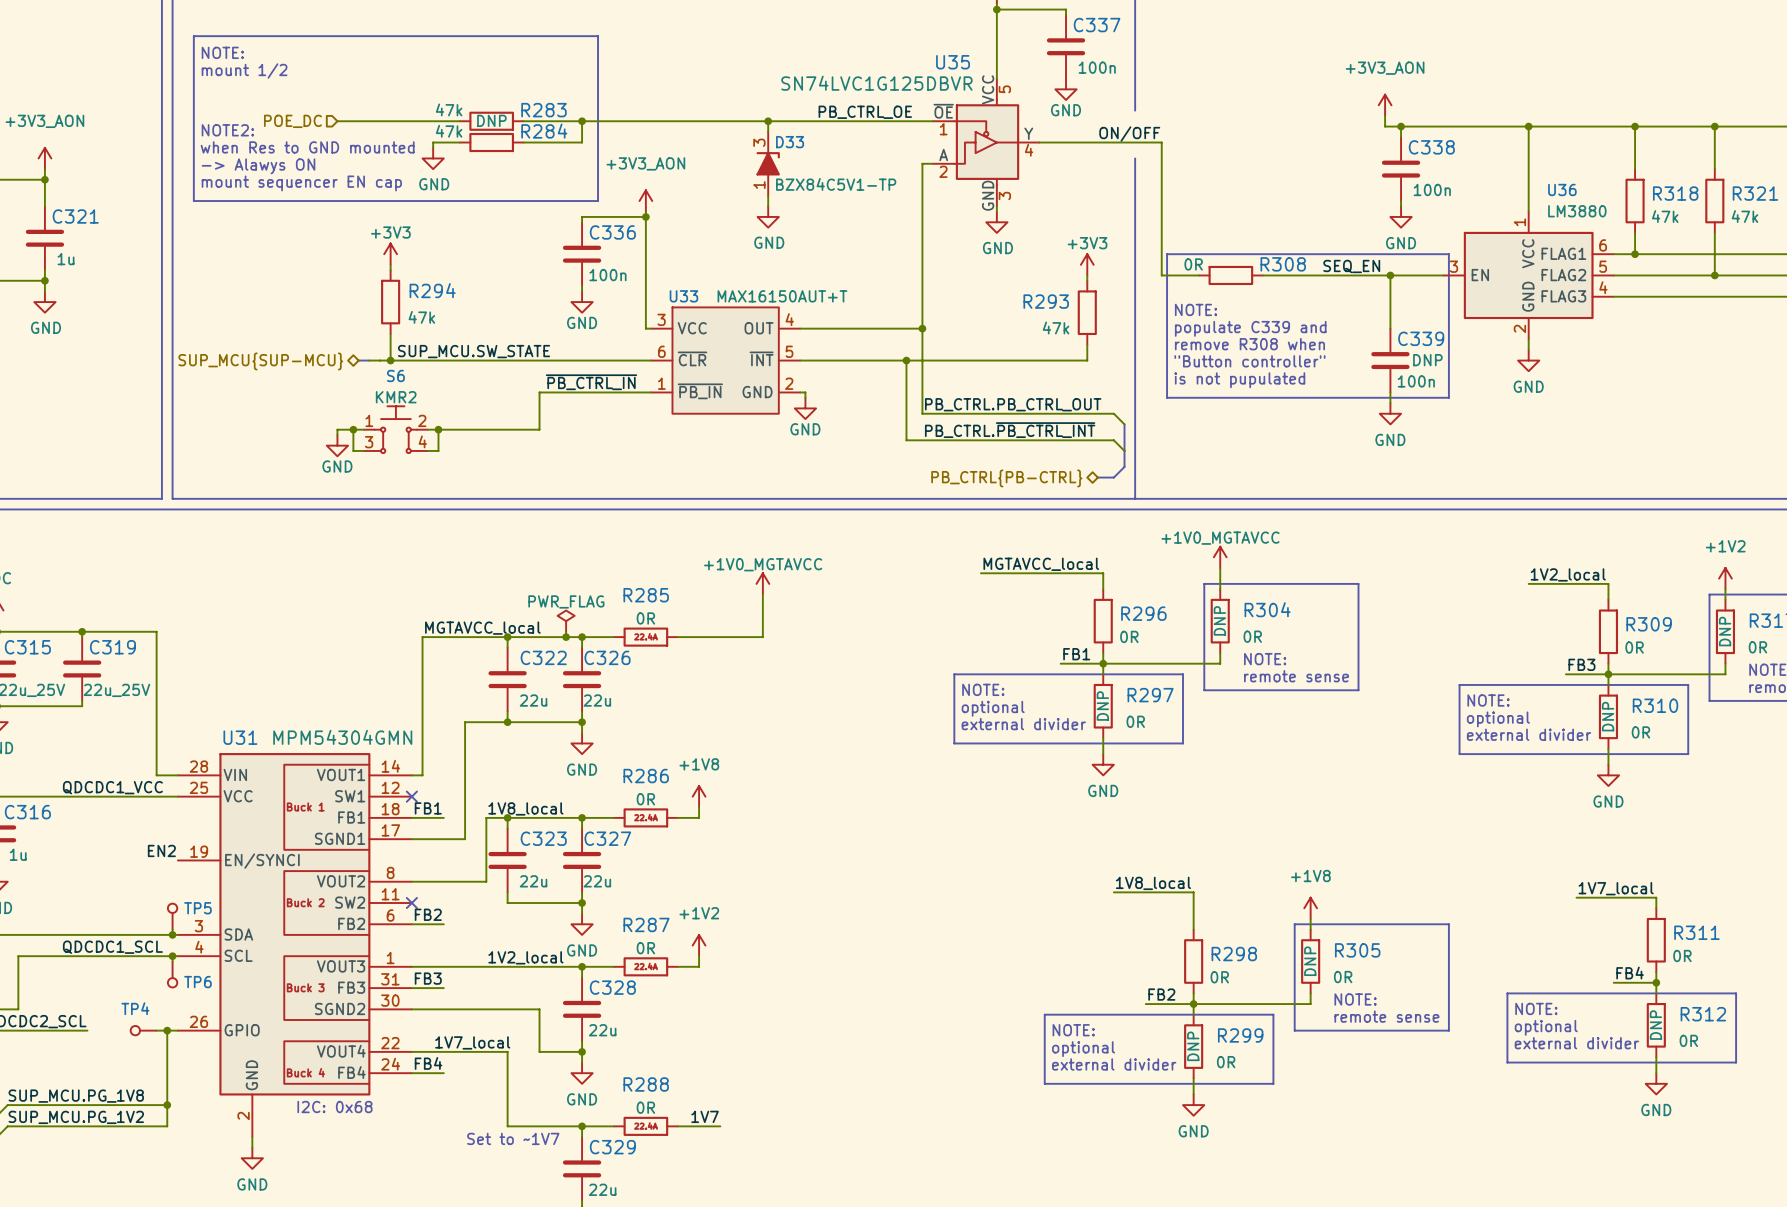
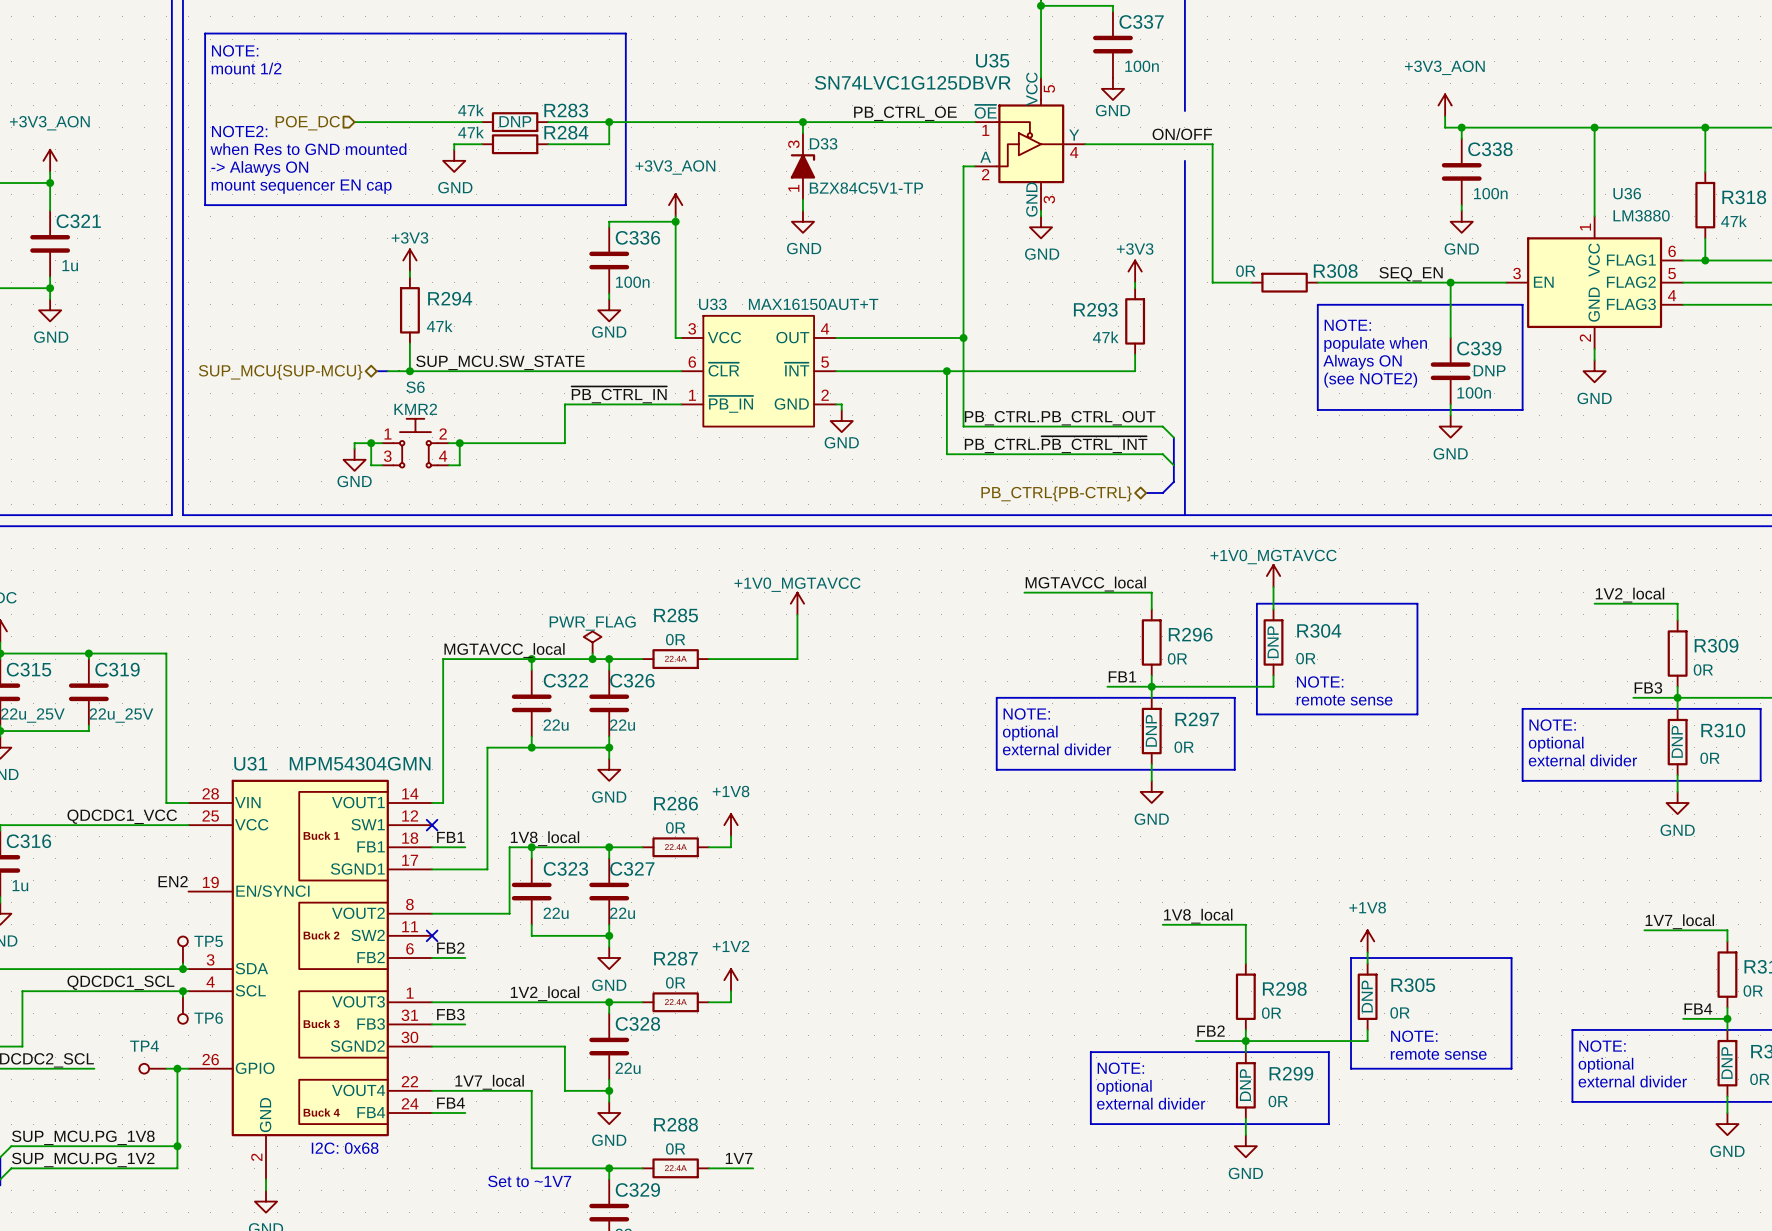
text position: NOTE: (1196, 309) -> NOTE: (1347, 325)
text: populate C339 and (1250, 328) -> populate when (1375, 344)
text: remove R308 when (1249, 344) -> none
text: none -> Always ON (1362, 362)
text: "Button controller" (1249, 361) -> none
text: none -> (see NOTE2) (1370, 380)
text: is not pupulated (1239, 380) -> none
line: (1262, 397) (1167, 397) (1167, 254) (1448, 254) (1448, 397) -> (1317, 409) (1317, 304) (1522, 304) (1522, 409) (1511, 409)

